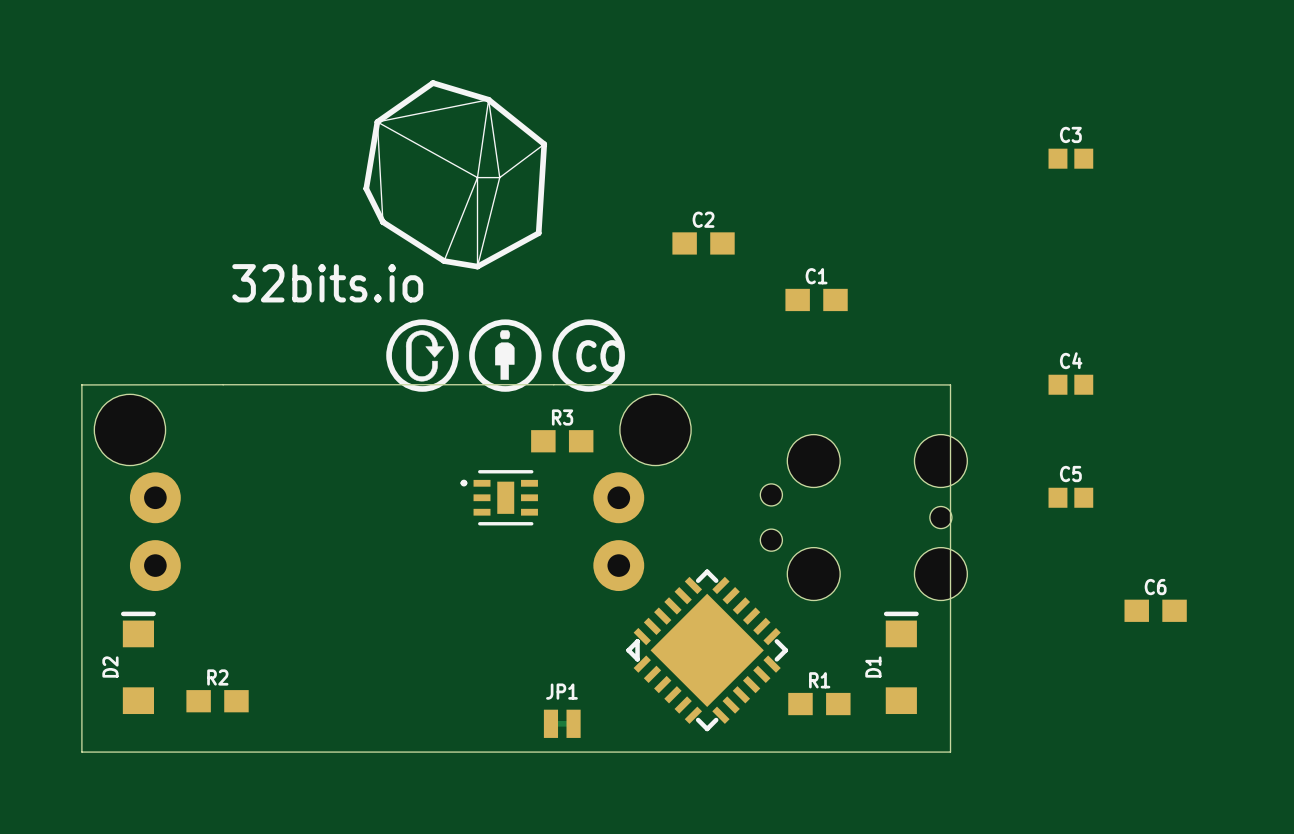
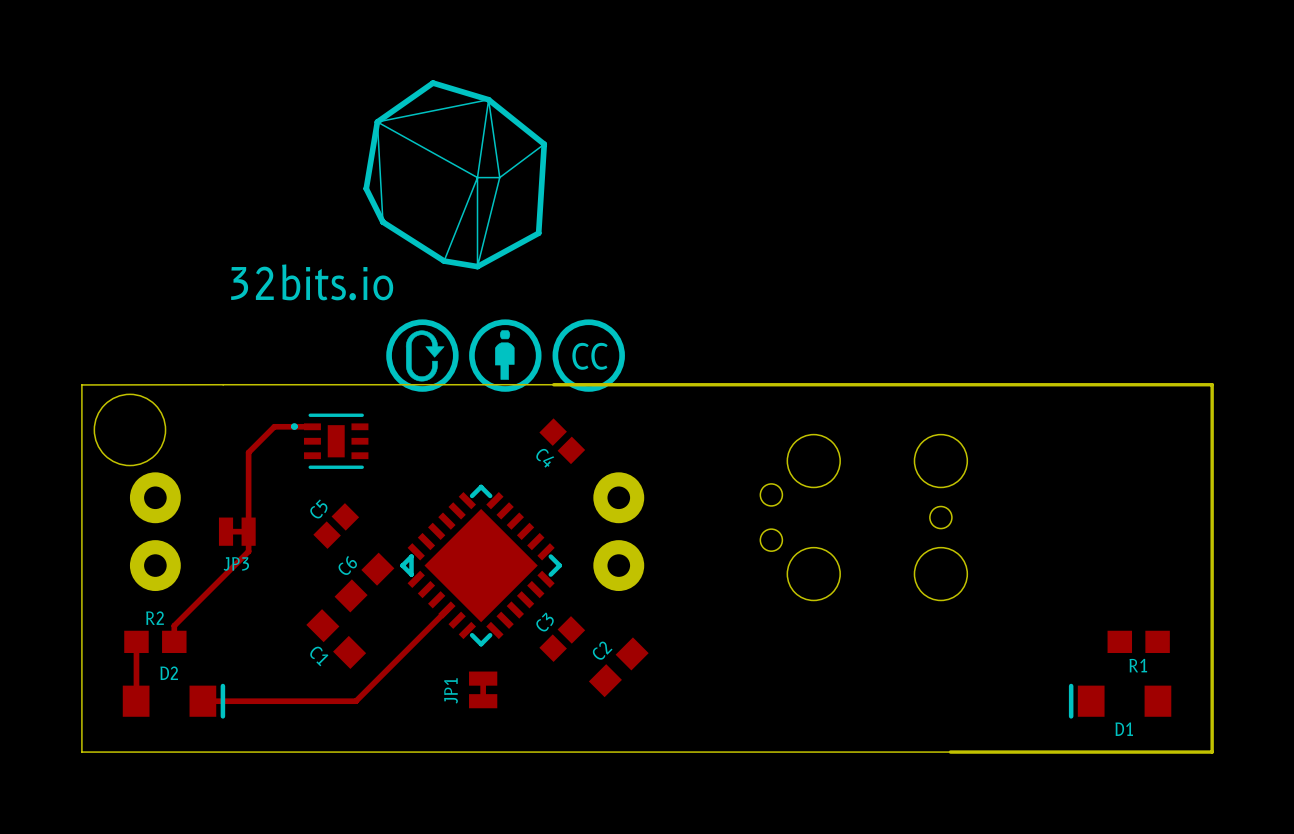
C3 rotation: 0° (1070, 158) -> 45° counterclockwise (562, 639)
C3 position: (1070, 158) -> (562, 639)
C2 rotation: 0° (703, 243) -> 45° counterclockwise (618, 667)
C2 position: (703, 243) -> (618, 667)
C1 rotation: 0° (816, 299) -> 45° clockwise (336, 639)
C1 position: (816, 299) -> (336, 639)
board edge: (553, 384) (950, 384) (950, 752) -> (553, 384) (1212, 384) (1212, 752) (950, 752)
C4 rotation: 0° (1070, 384) -> 45° clockwise (562, 441)
C4 position: (1070, 384) -> (562, 441)
track: none -> (312, 426) (274, 426) (248, 452) (248, 522)
hole: (655, 429) -> none
R3: (562, 441) -> none
part position: (499, 497) -> (329, 441)
C5 rotation: 0° (1070, 497) -> 45° counterclockwise (336, 526)
C5 position: (1070, 497) -> (336, 526)
JP3: none -> (237, 531)
track: none -> (248, 540) (248, 551) (174, 625) (174, 641)
track: none -> (446, 610) (356, 701) (202, 701)
C6 rotation: 0° (1155, 610) -> 45° counterclockwise (364, 582)
C6 position: (1155, 610) -> (364, 582)
track: none -> (136, 641) (136, 701)
part position: (707, 650) -> (481, 565)
D2 rotation: 0° (138, 662) -> 90° clockwise (173, 701)
D1 rotation: 0° (901, 662) -> 90° counterclockwise (1120, 701)
D1 position: (901, 662) -> (1120, 701)
R1 name position: R1 (819, 680) -> R1 (1138, 665)
JP1 name position: JP1 (561, 691) -> JP1 (451, 690)
R2 position: (217, 701) -> (155, 641)
R1 position: (819, 704) -> (1138, 641)
JP1 rotation: 0° (562, 723) -> 90° clockwise (483, 689)
JP1 position: (562, 723) -> (483, 689)

